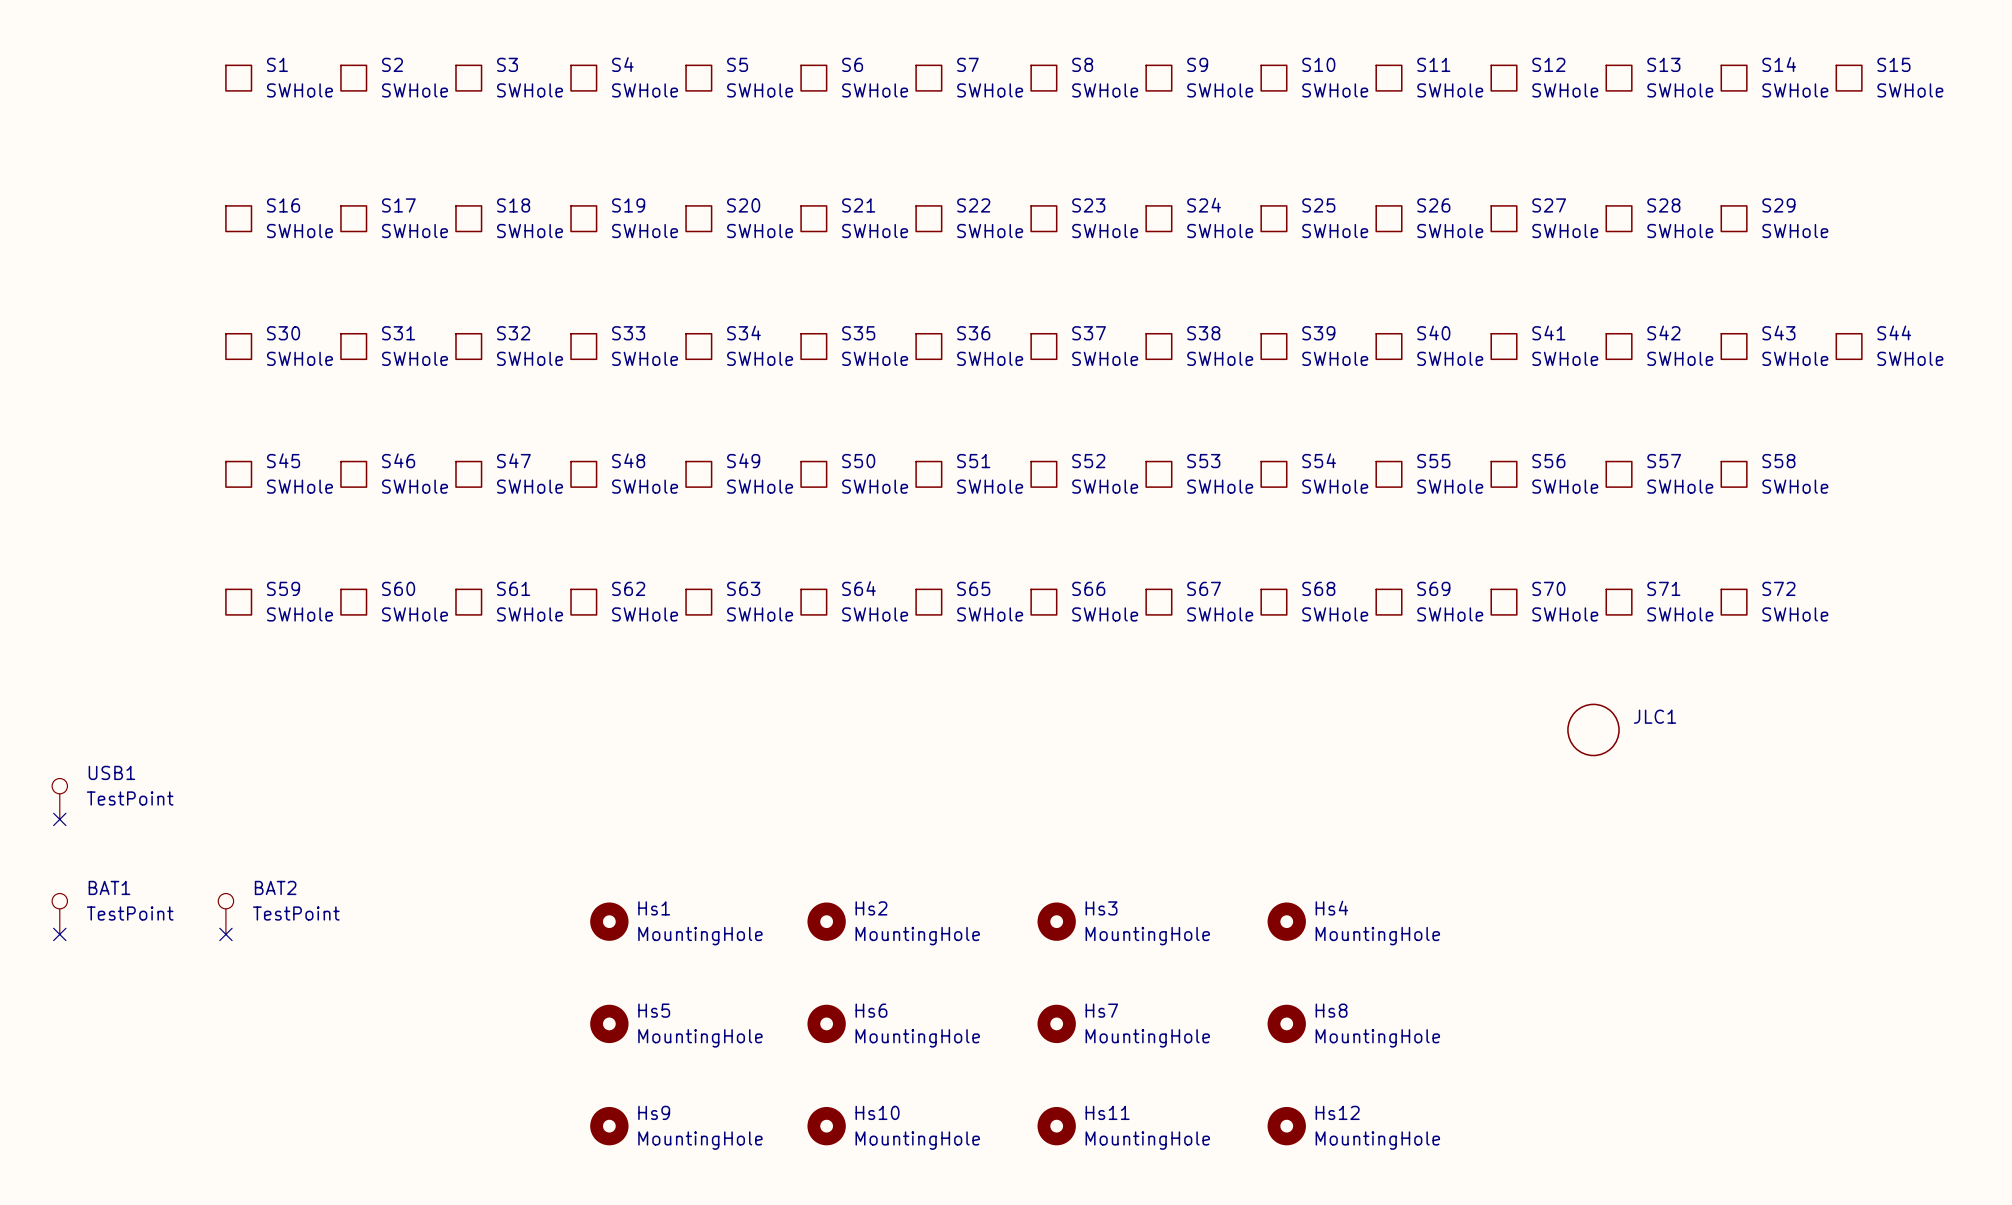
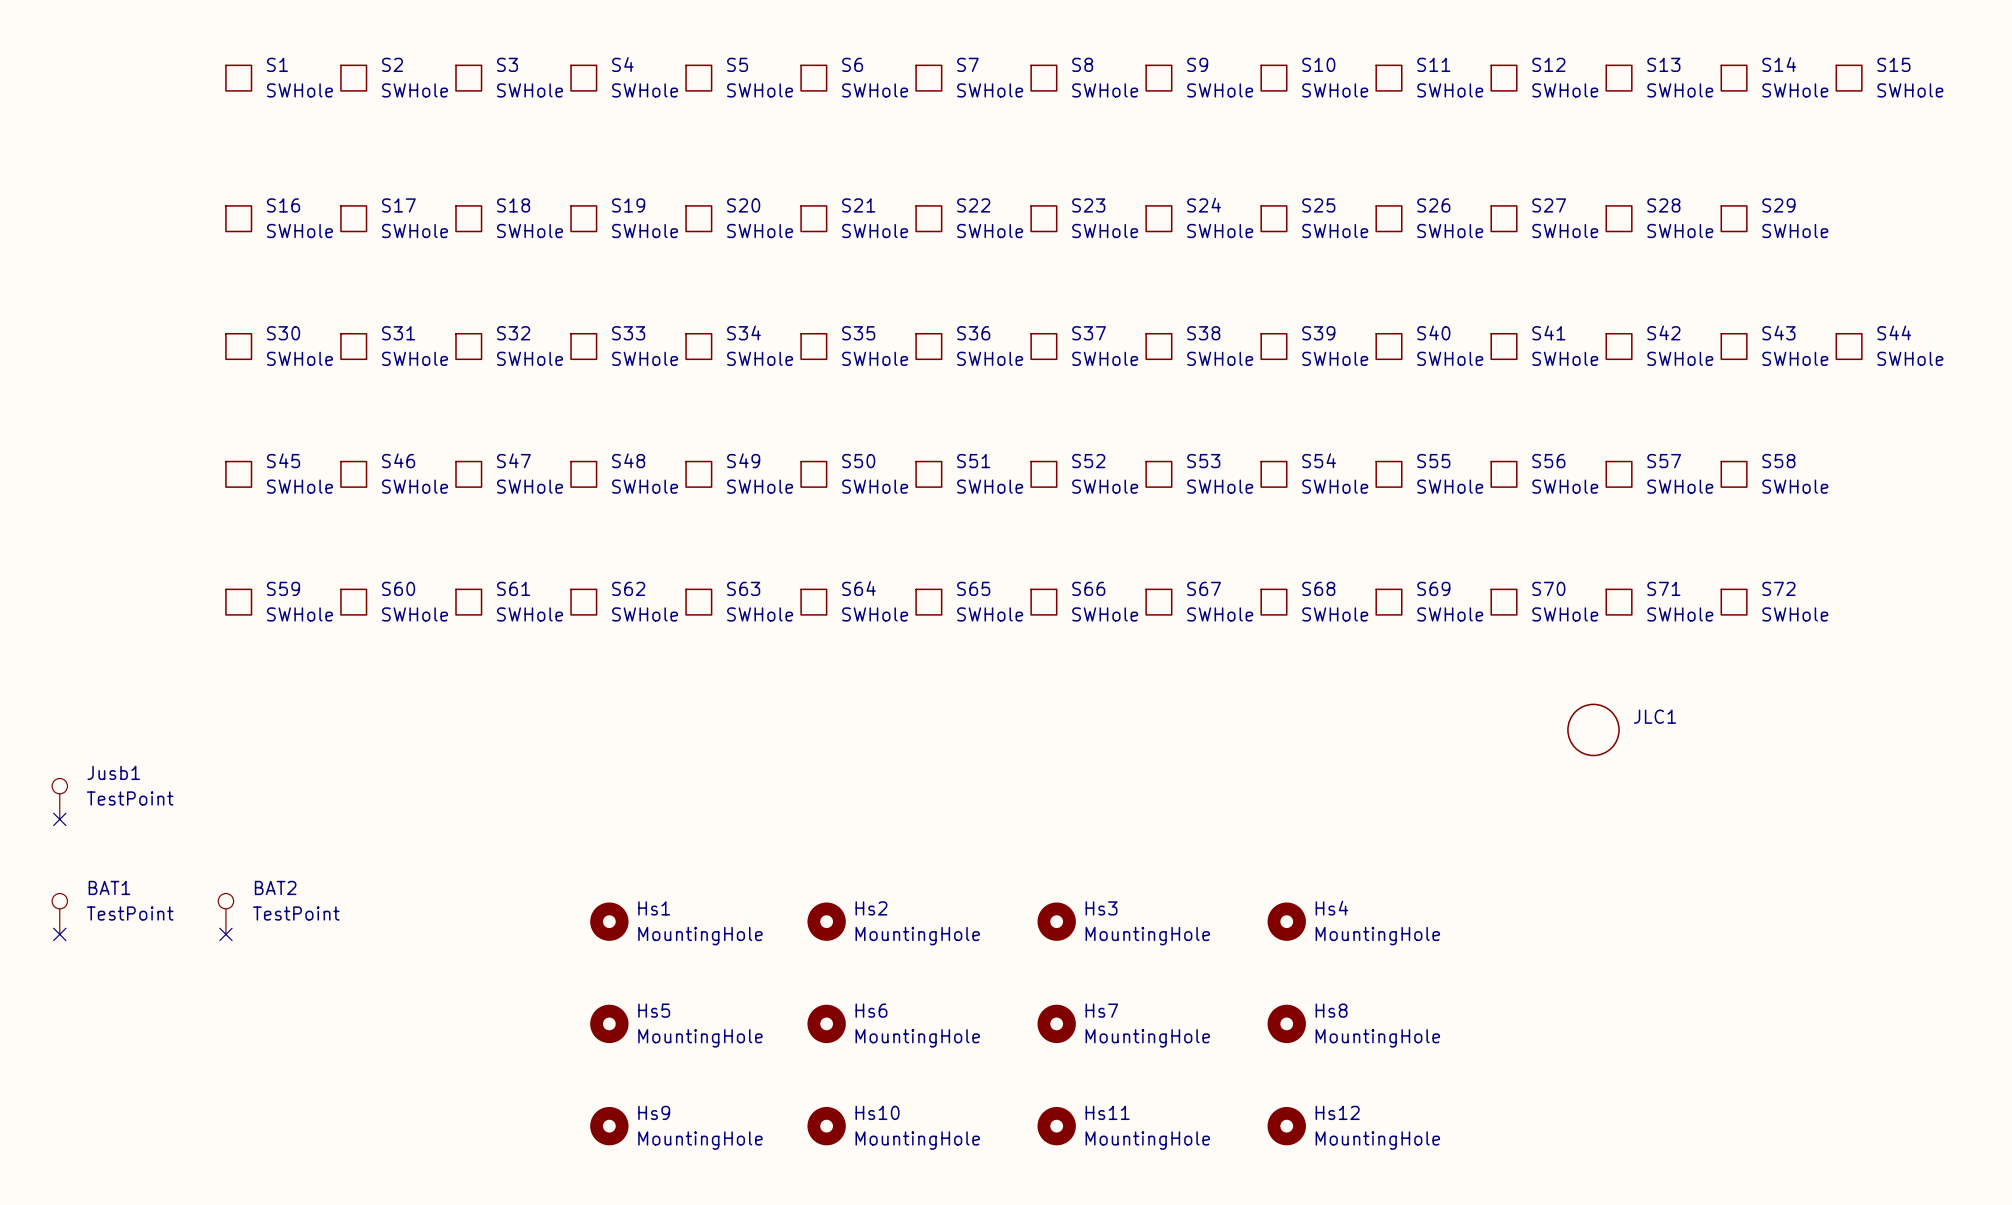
USB1 name: USB1 (111, 772) -> Jusb1 (113, 772)

